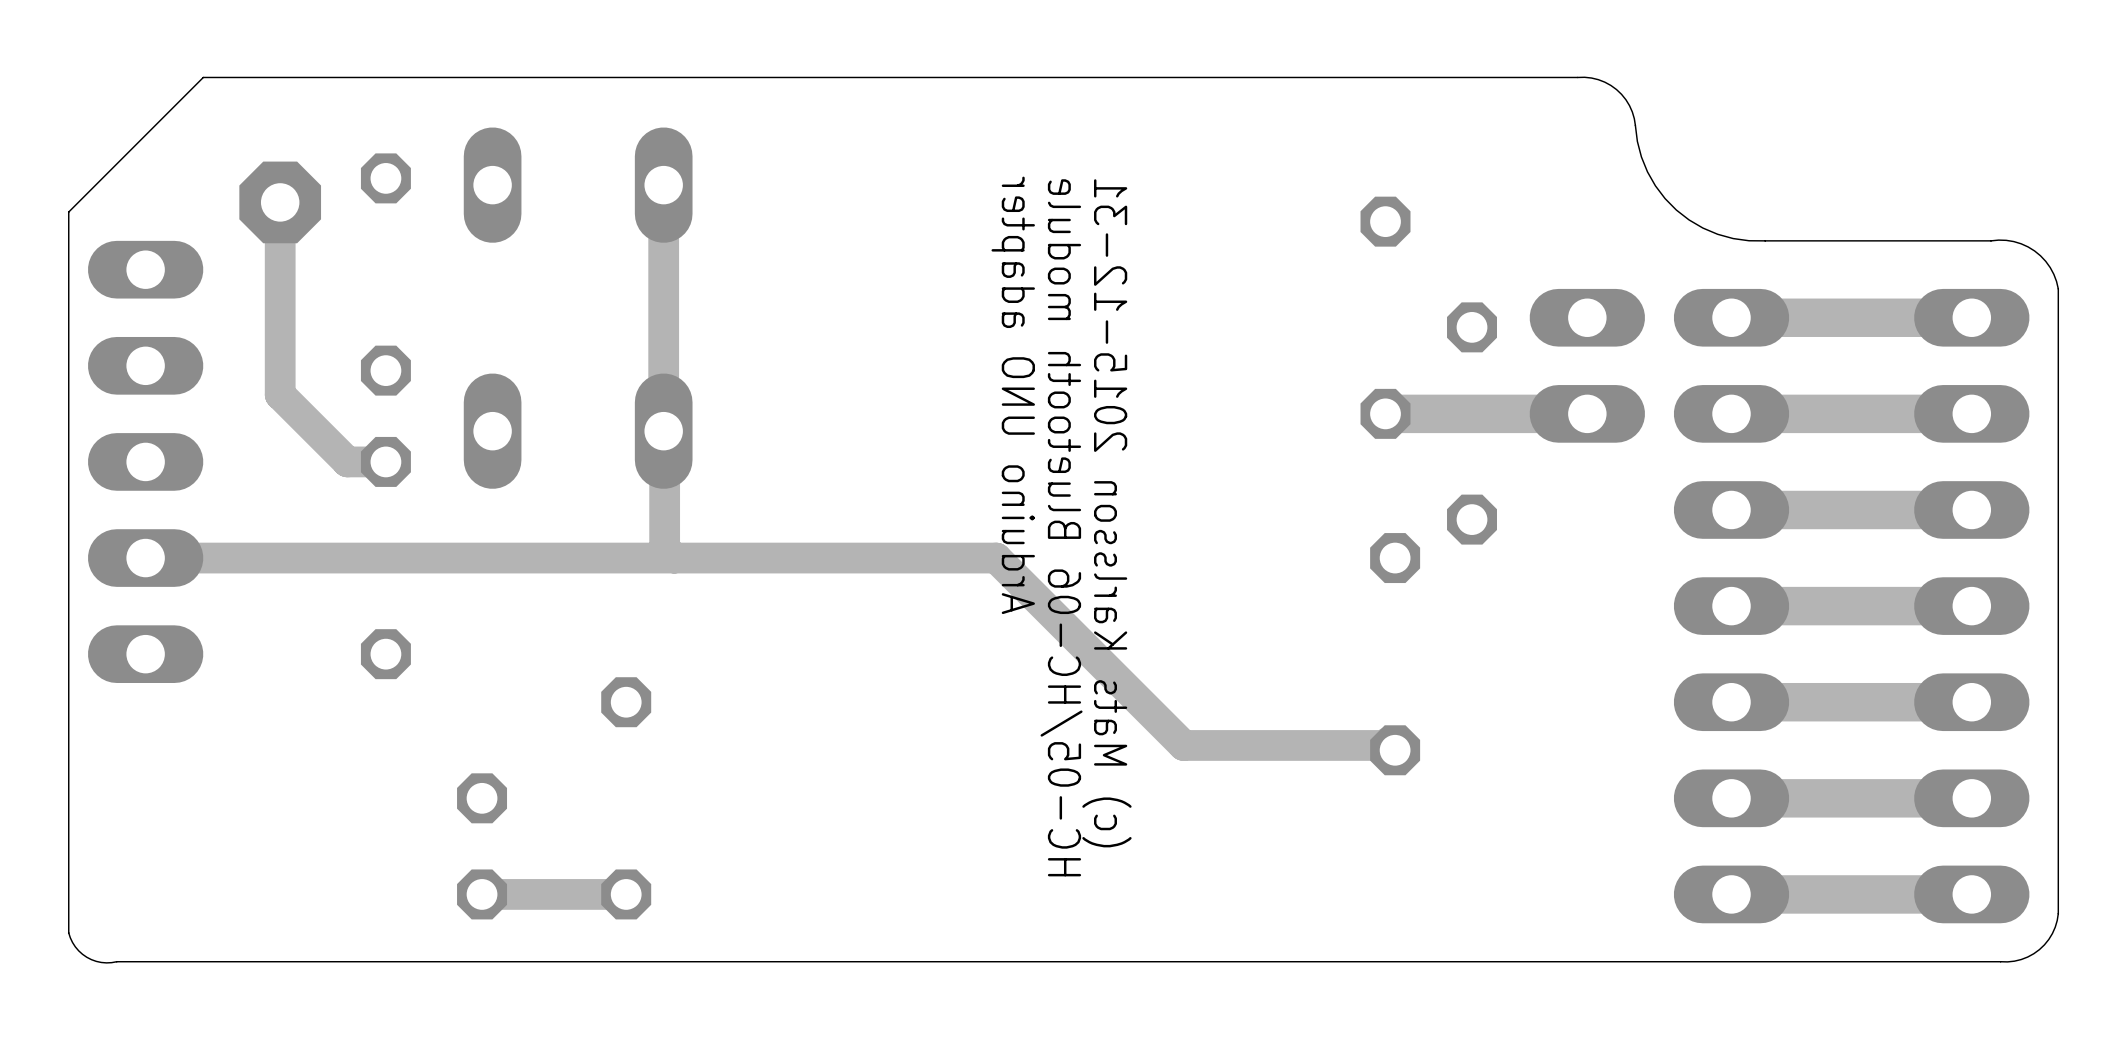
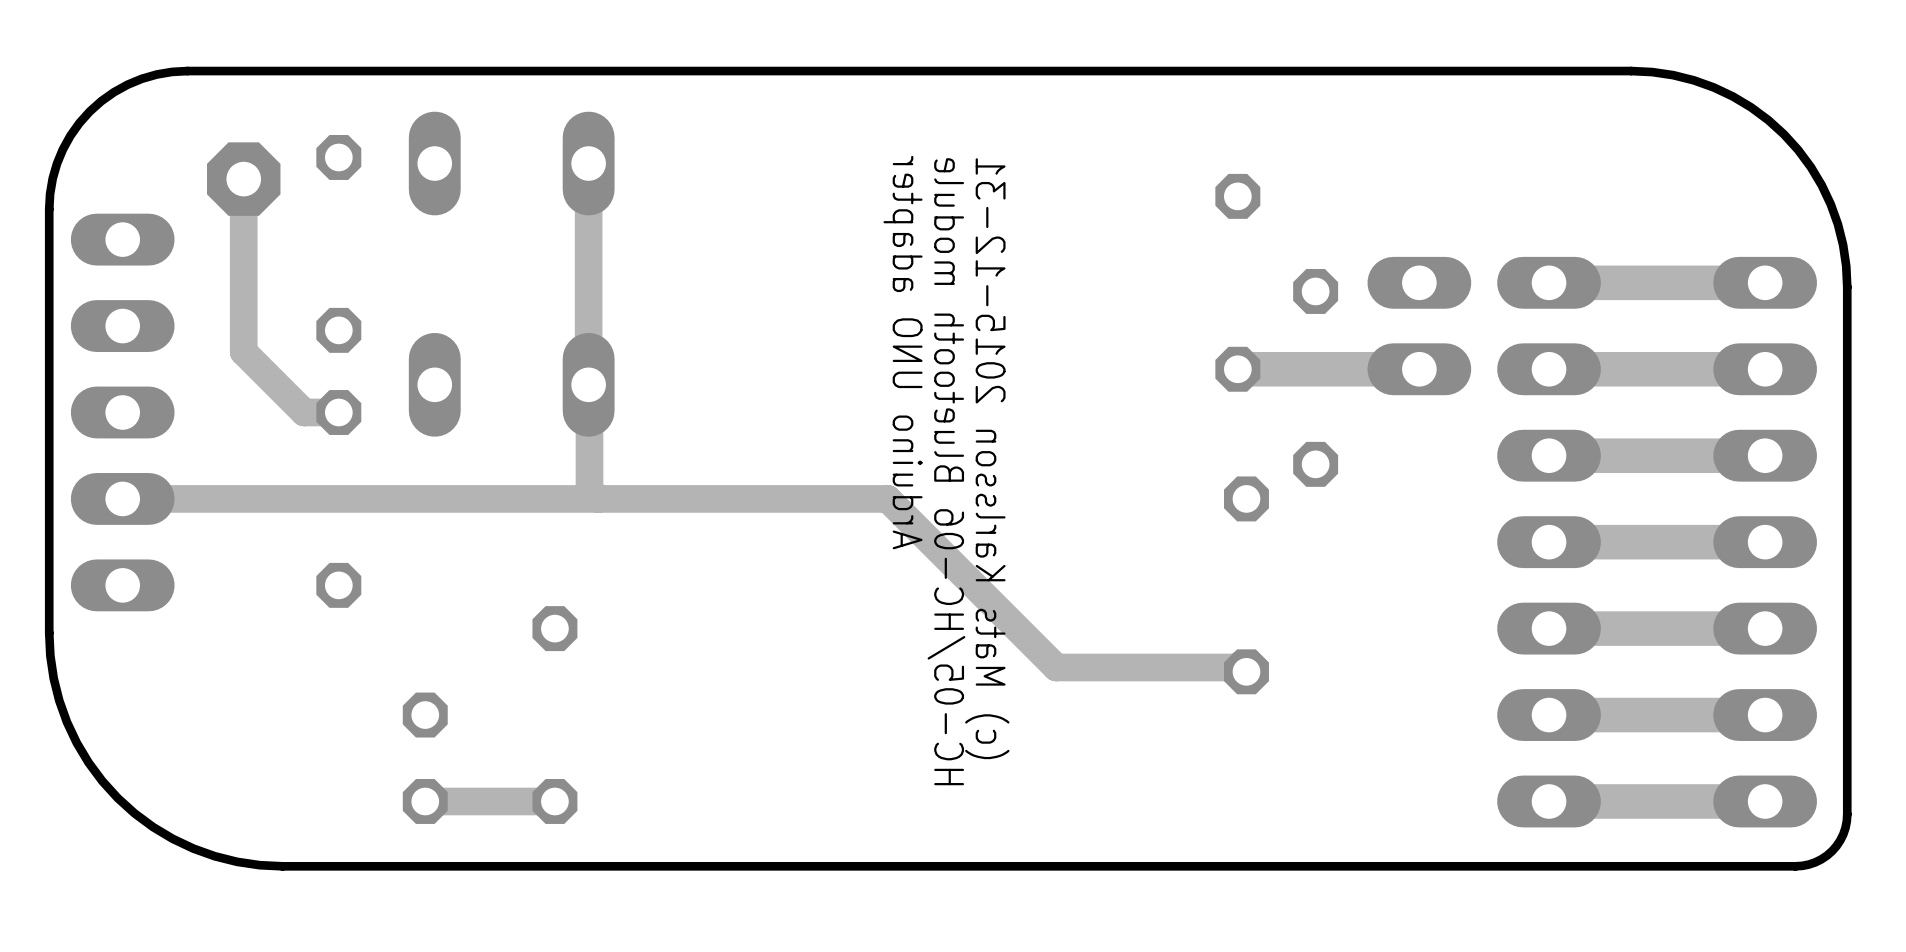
board edge: (1577, 77) (203, 77) (68, 212) (68, 932) (72, 942) (86, 957) (106, 962) (2007, 961) (2021, 959) (2033, 953) (2044, 944) (2052, 933) (2058, 913) (2058, 288) (2053, 274) (2045, 261) (2034, 250) (2021, 243) (2006, 240) (1749, 240) (1717, 234) (1702, 228) (1676, 210) (1655, 185) (1641, 157) (1632, 112) (1621, 94) (1610, 85) (1598, 79) (1577, 77) -> (1631, 71) (1673, 75) (1693, 80) (1733, 96) (1768, 120) (1798, 150) (1821, 185) (1837, 224) (1843, 244) (1847, 287) (1847, 814) (1845, 827) (1836, 846) (1826, 855) (1815, 862) (1795, 866) (259, 865) (214, 856) (193, 848) (152, 826) (134, 813) (102, 780) (88, 762) (67, 722) (53, 678) (49, 632) (50, 193) (56, 163) (70, 135) (79, 123) (101, 101) (127, 84) (156, 74) (187, 71) (1631, 71)

